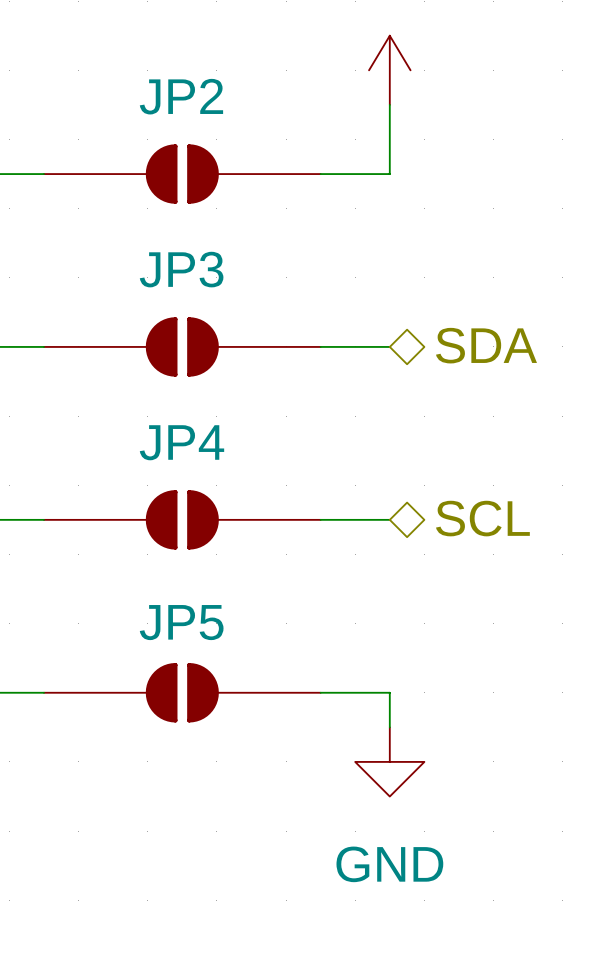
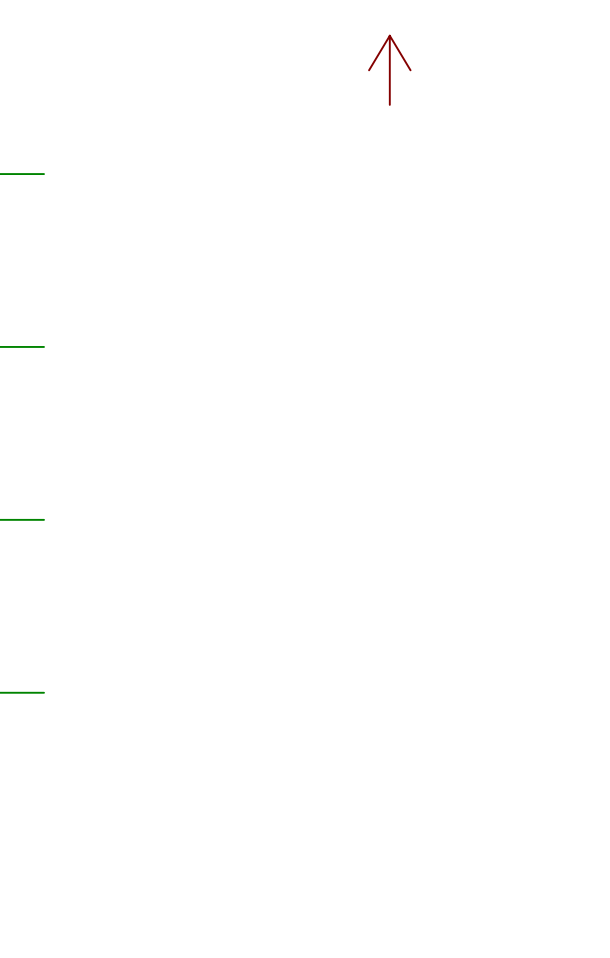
wire: (389, 104) (389, 174) (320, 174) -> none
JP2: (182, 174) -> none
hierarchical label: SDA (486, 345) -> none
JP3: (182, 346) -> none
wire: (320, 346) (389, 346) -> none
hierarchical label: SCL (482, 518) -> none
JP4: (182, 519) -> none
wire: (320, 519) (389, 519) -> none
JP5: (182, 692) -> none
wire: (320, 692) (389, 692) (389, 727) -> none
power symbol: GND (389, 761) -> none

